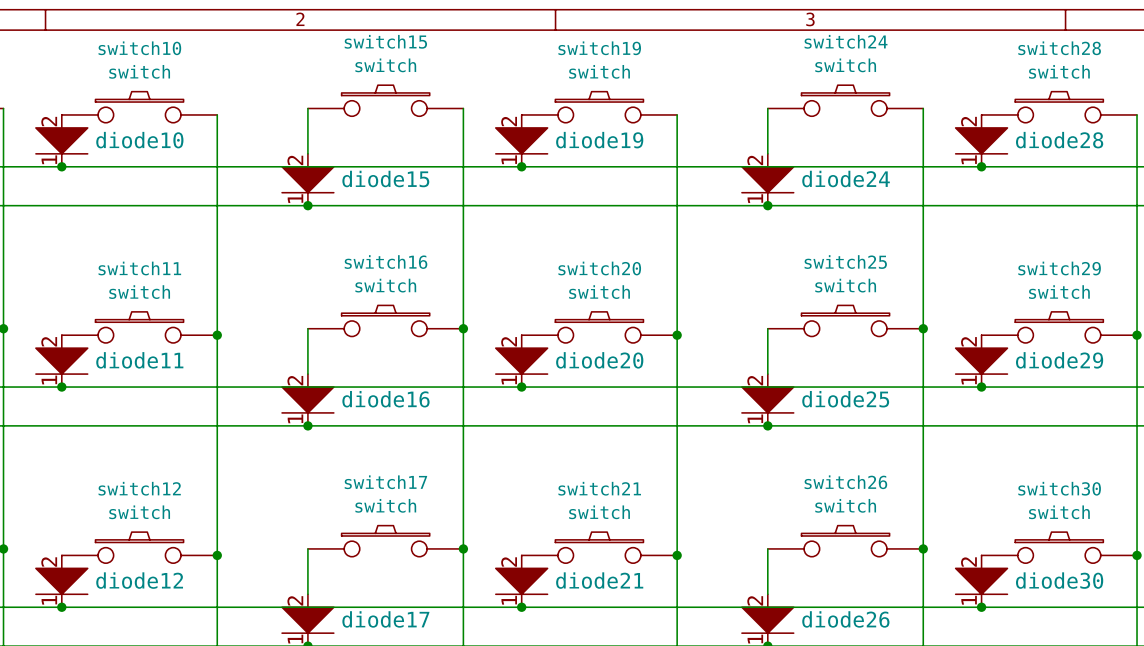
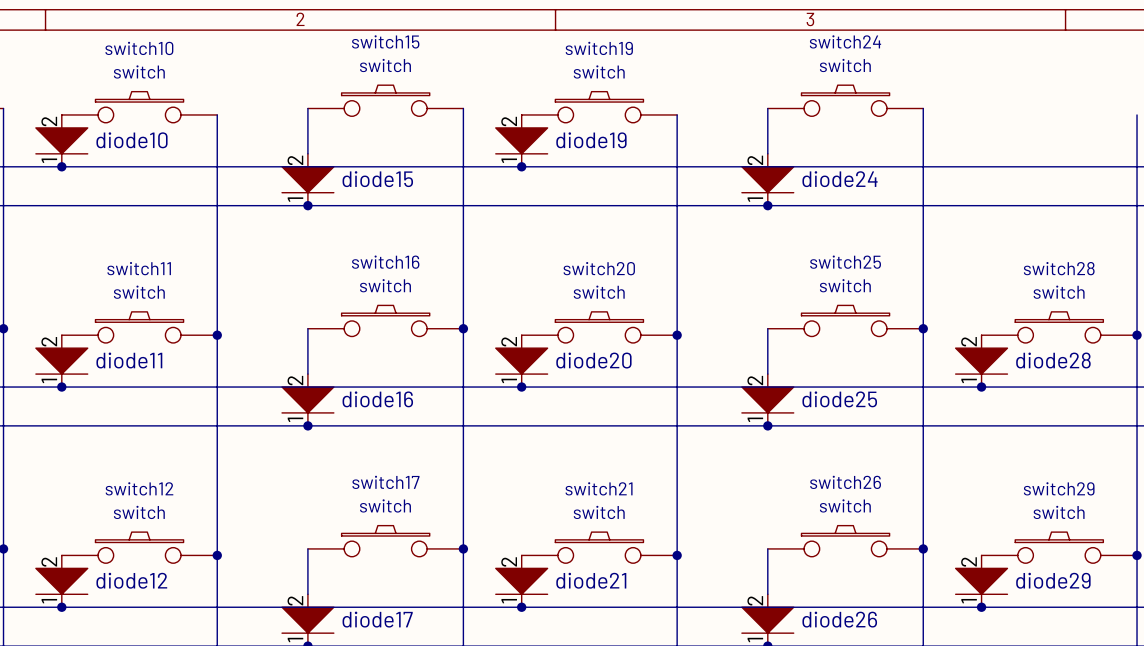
switch28: switch (1059, 107) -> none
diode28: (981, 140) -> none
junction: (981, 166) -> none
switch29 name: switch29 (1059, 268) -> switch28 (1059, 268)
diode29 name: diode29 (1059, 360) -> diode28 (1053, 360)
switch30 name: switch30 (1059, 488) -> switch29 (1059, 488)
diode30 name: diode30 (1059, 580) -> diode29 (1053, 580)

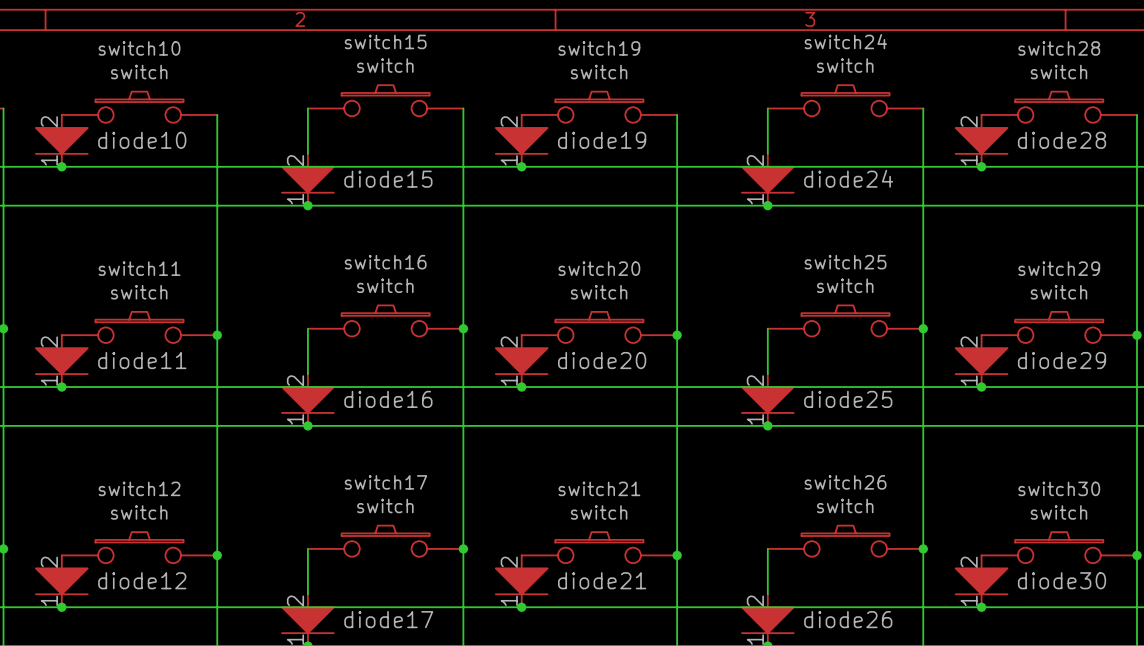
switch28: none -> switch (1059, 107)
diode28: none -> (981, 140)
junction: none -> (981, 166)
switch28 name: switch28 (1059, 268) -> switch29 (1059, 268)
diode28 name: diode28 (1053, 360) -> diode29 (1062, 360)
switch29 name: switch29 (1059, 488) -> switch30 (1059, 488)
diode29 name: diode29 (1053, 580) -> diode30 (1062, 580)

